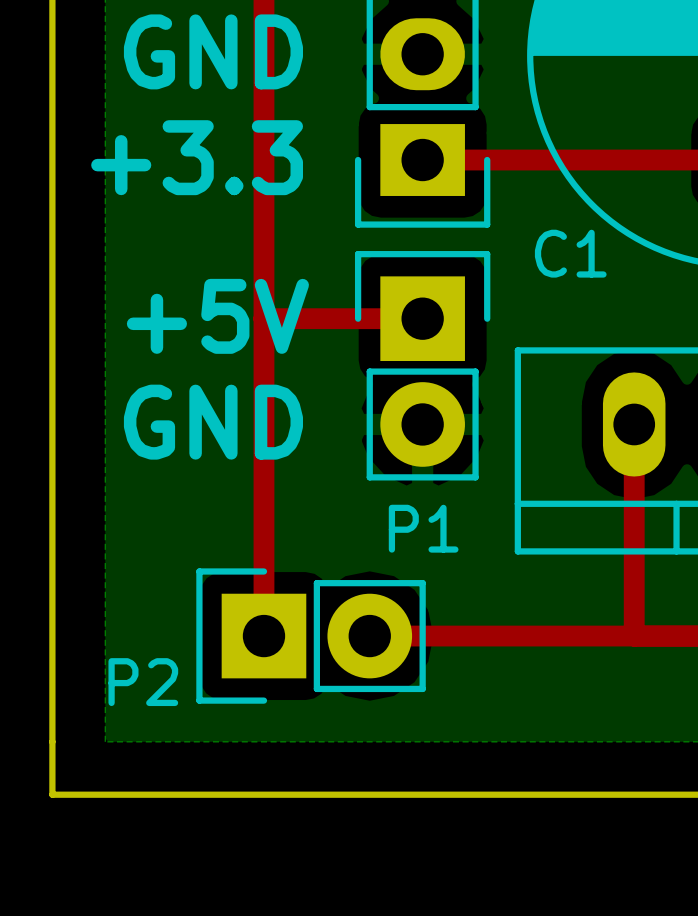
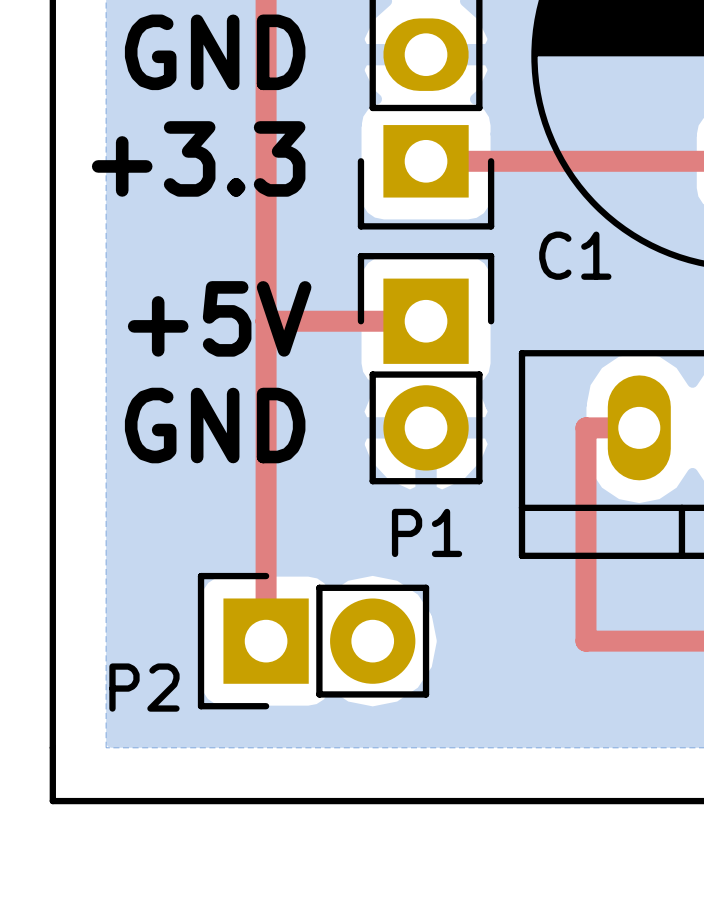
top track: (634, 424) (634, 636) -> (639, 427) (585, 427) (585, 641)
top track: (369, 636) (581, 636) -> none

